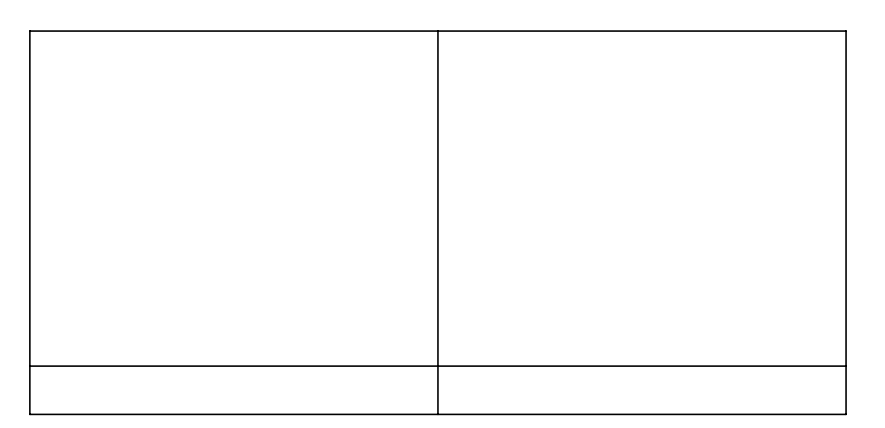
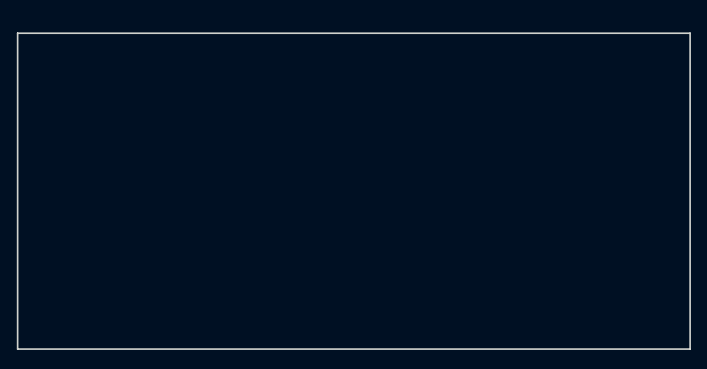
board edge: (437, 31) (437, 414) -> none
board edge: (846, 366) (29, 366) -> none

